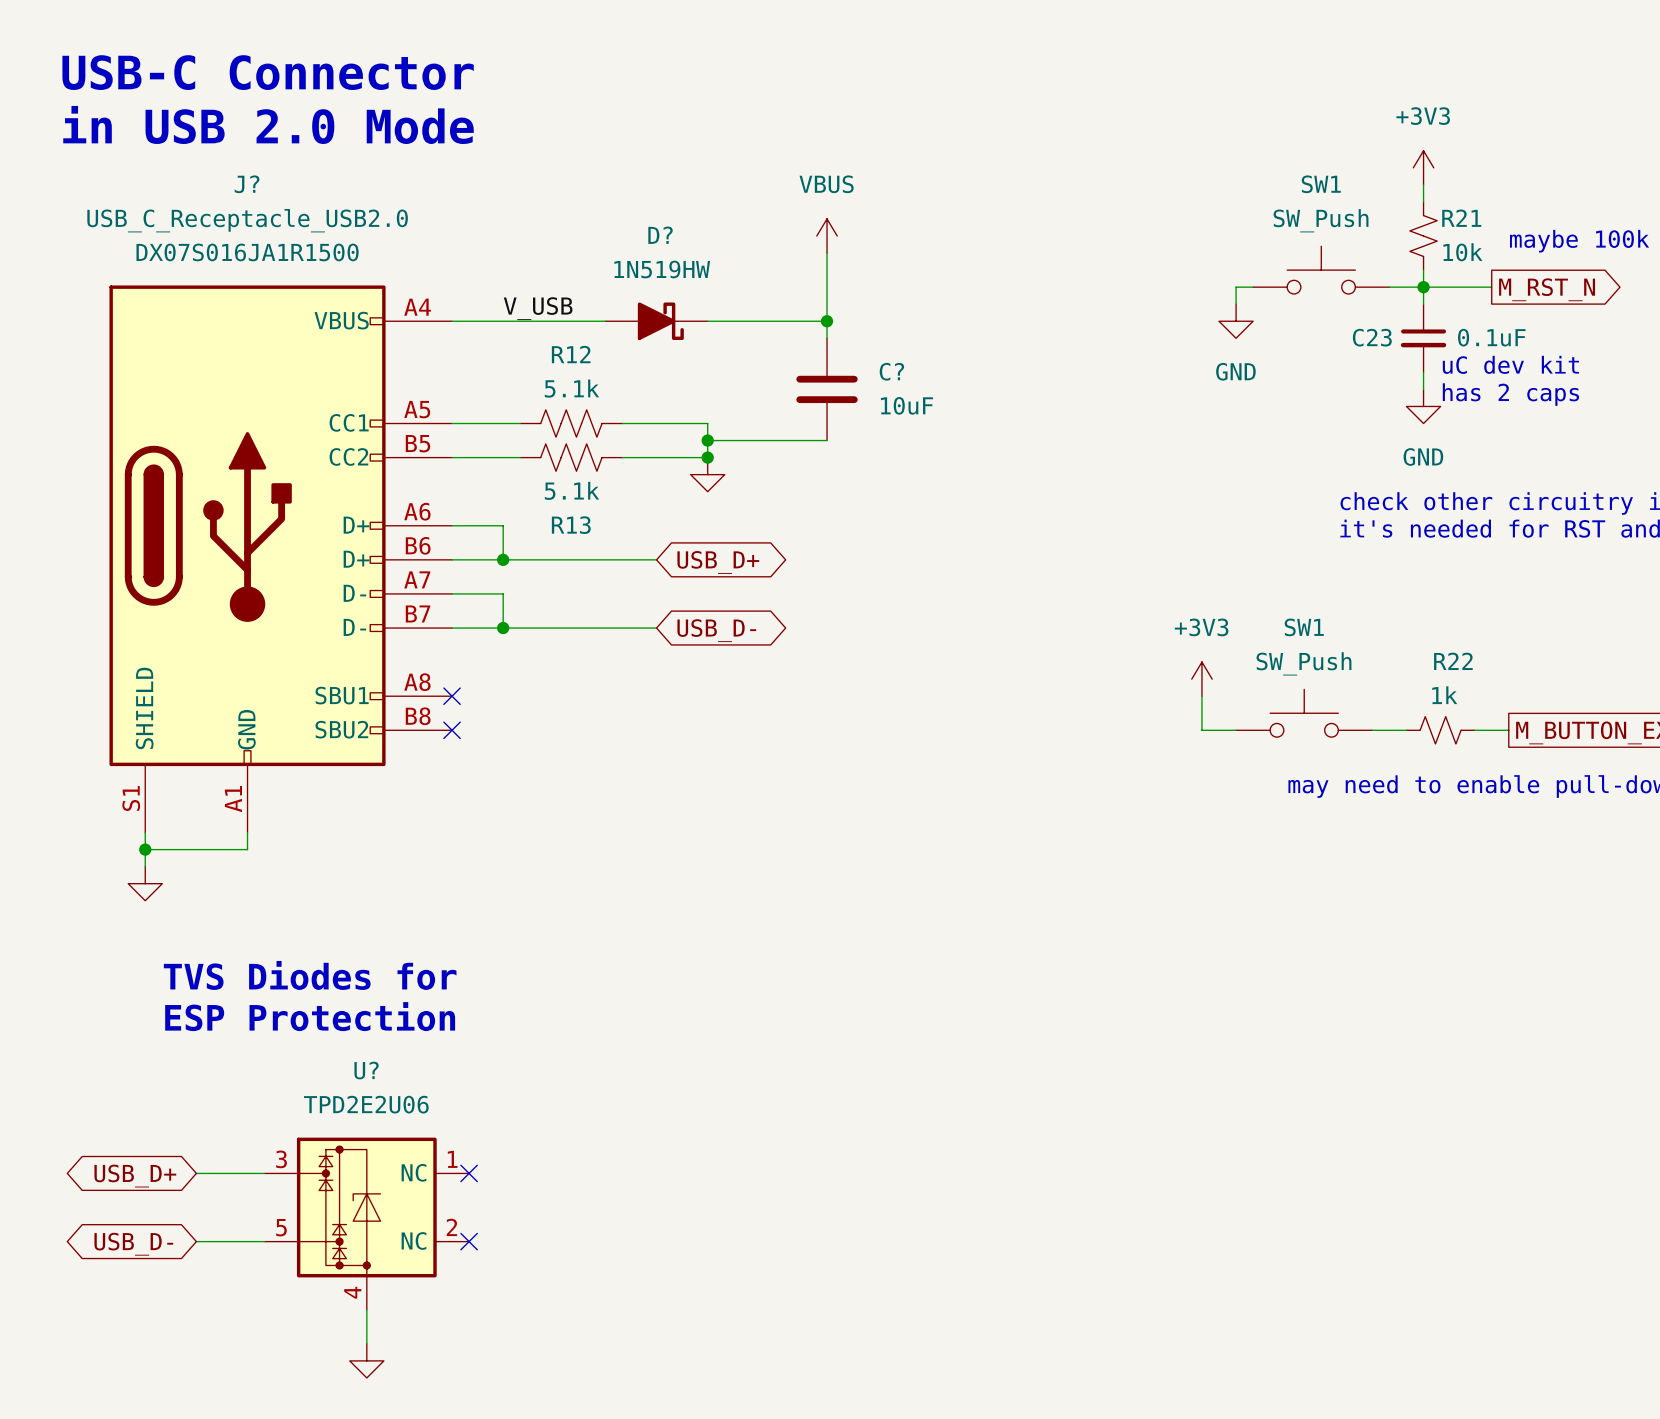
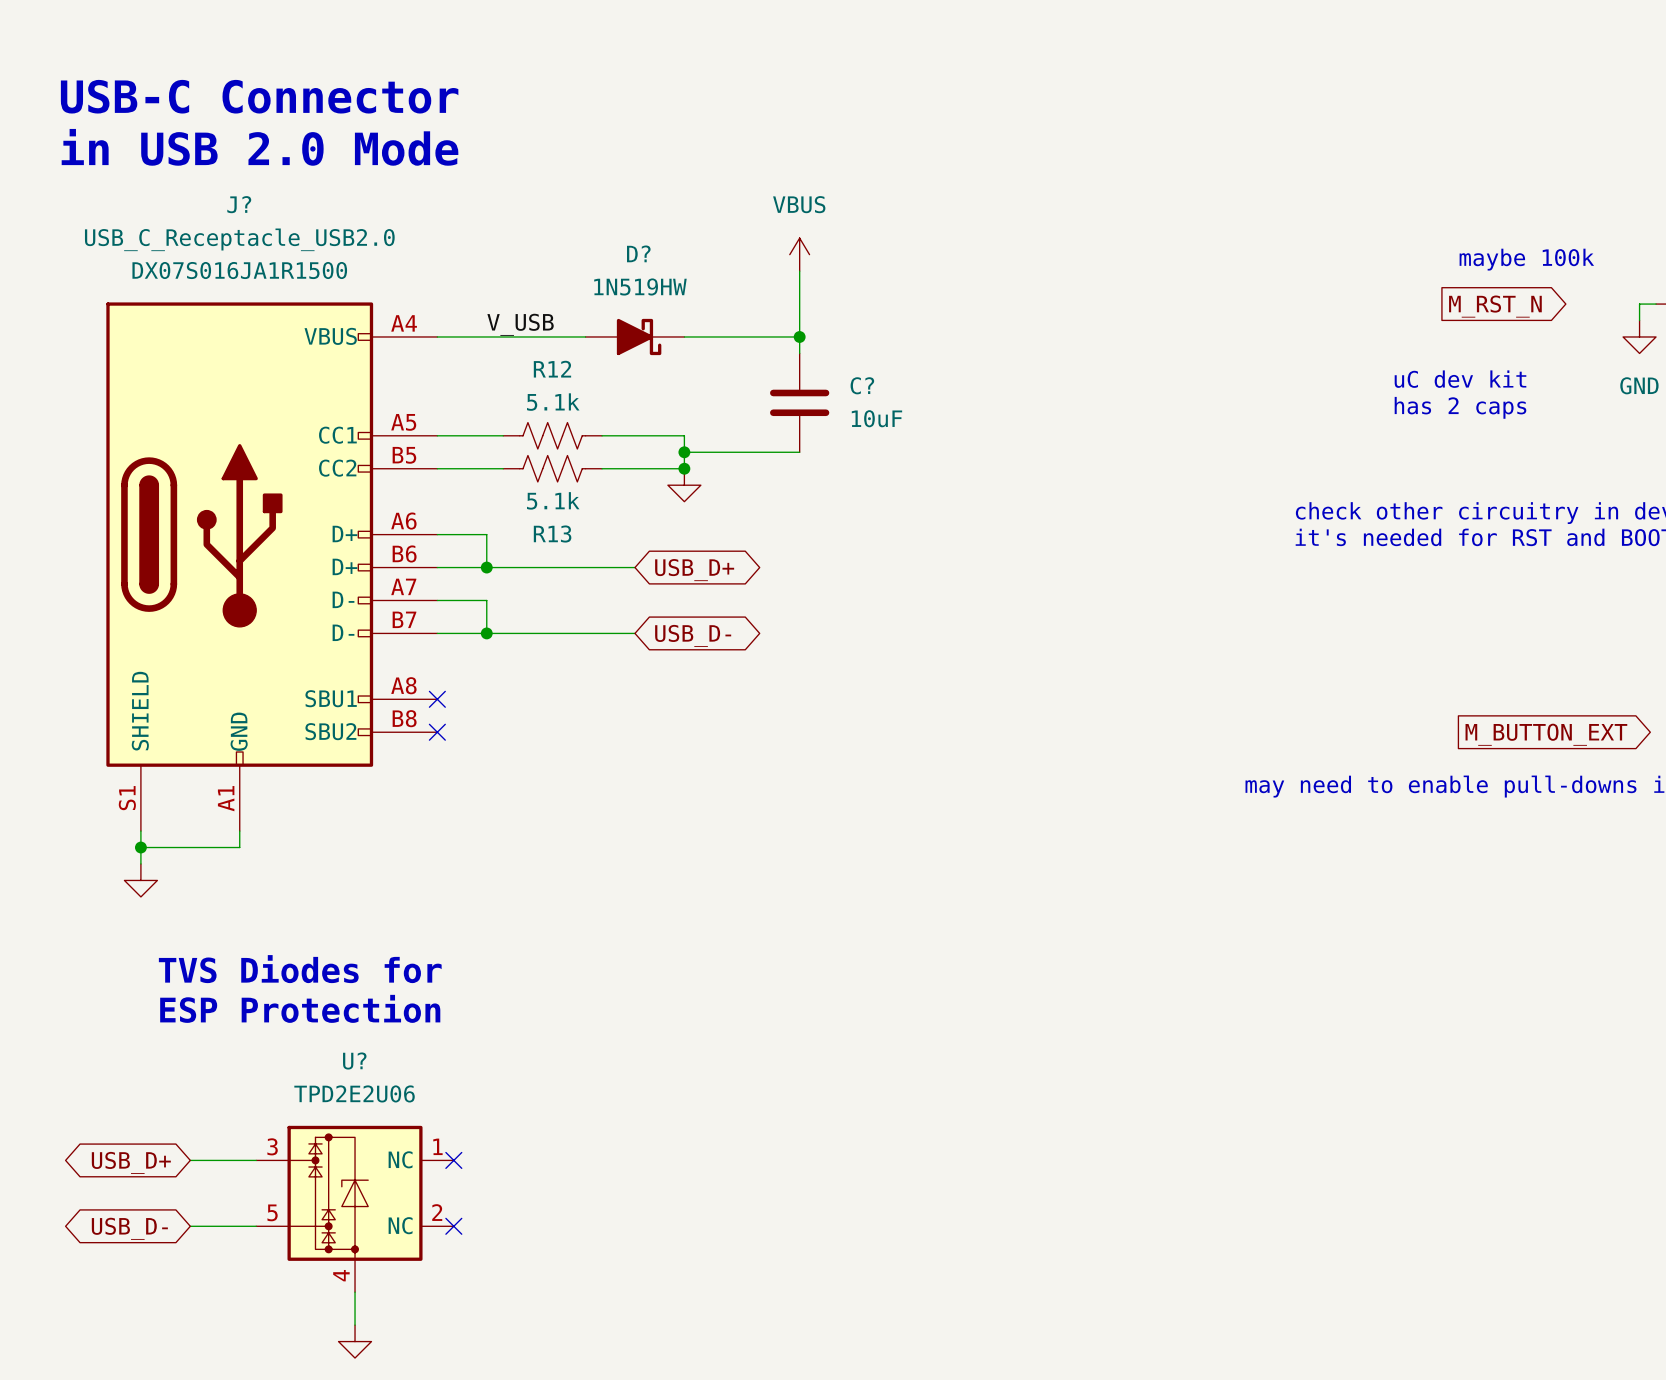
power symbol: +3V3 (1423, 167) -> none
wire: (1423, 184) (1423, 201) -> none
R21: 10k (1423, 236) -> none
SW1: SW_Push (1321, 270) -> none
wire: (1423, 270) (1423, 304) -> none
wire: (1253, 287) (1236, 287) (1236, 304) -> none
wire: (1389, 287) (1491, 287) -> none
junction: (1423, 287) -> none
power symbol: GND (1236, 321) -> none
C23: 0.1uF (1423, 338) -> none
wire: (1423, 372) (1423, 389) -> none
power symbol: GND (1423, 406) -> none
power symbol: +3V3 (1201, 679) -> none
wire: (1201, 696) (1201, 730) (1236, 730) -> none
SW1: SW_Push (1304, 713) -> none
wire: (1372, 730) (1406, 730) -> none
R22: 1k (1440, 730) -> none
wire: (1474, 730) (1508, 730) -> none

